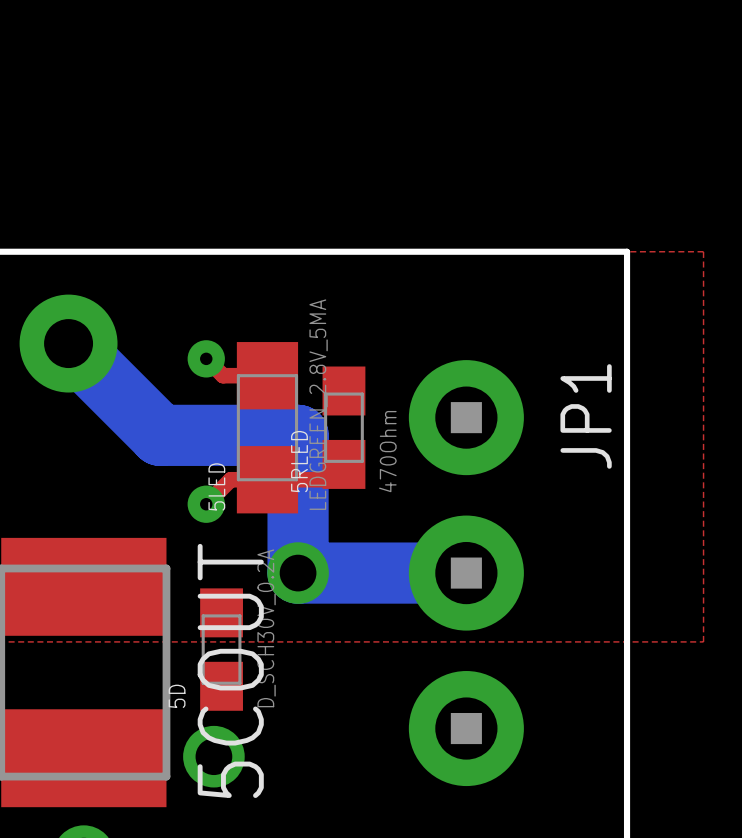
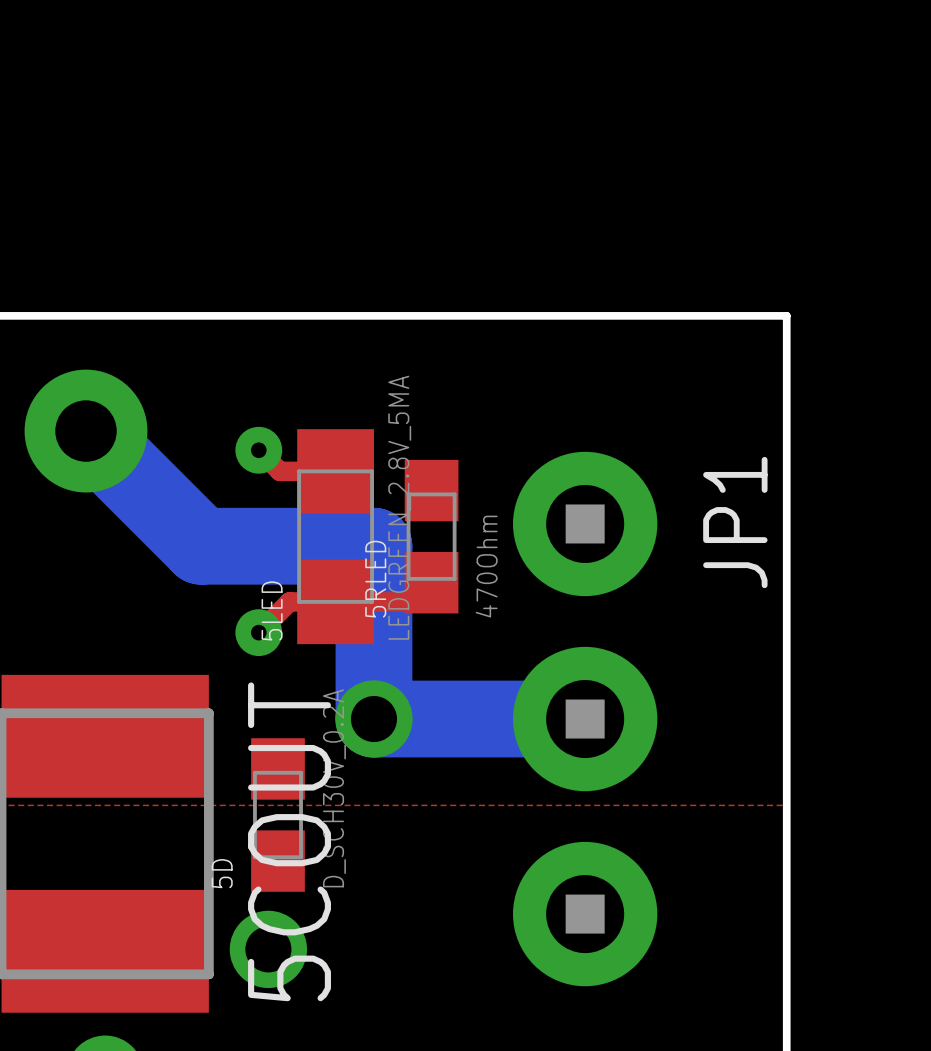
top zone outline: (627, 251) (703, 251) (703, 641) (627, 641) -> none

